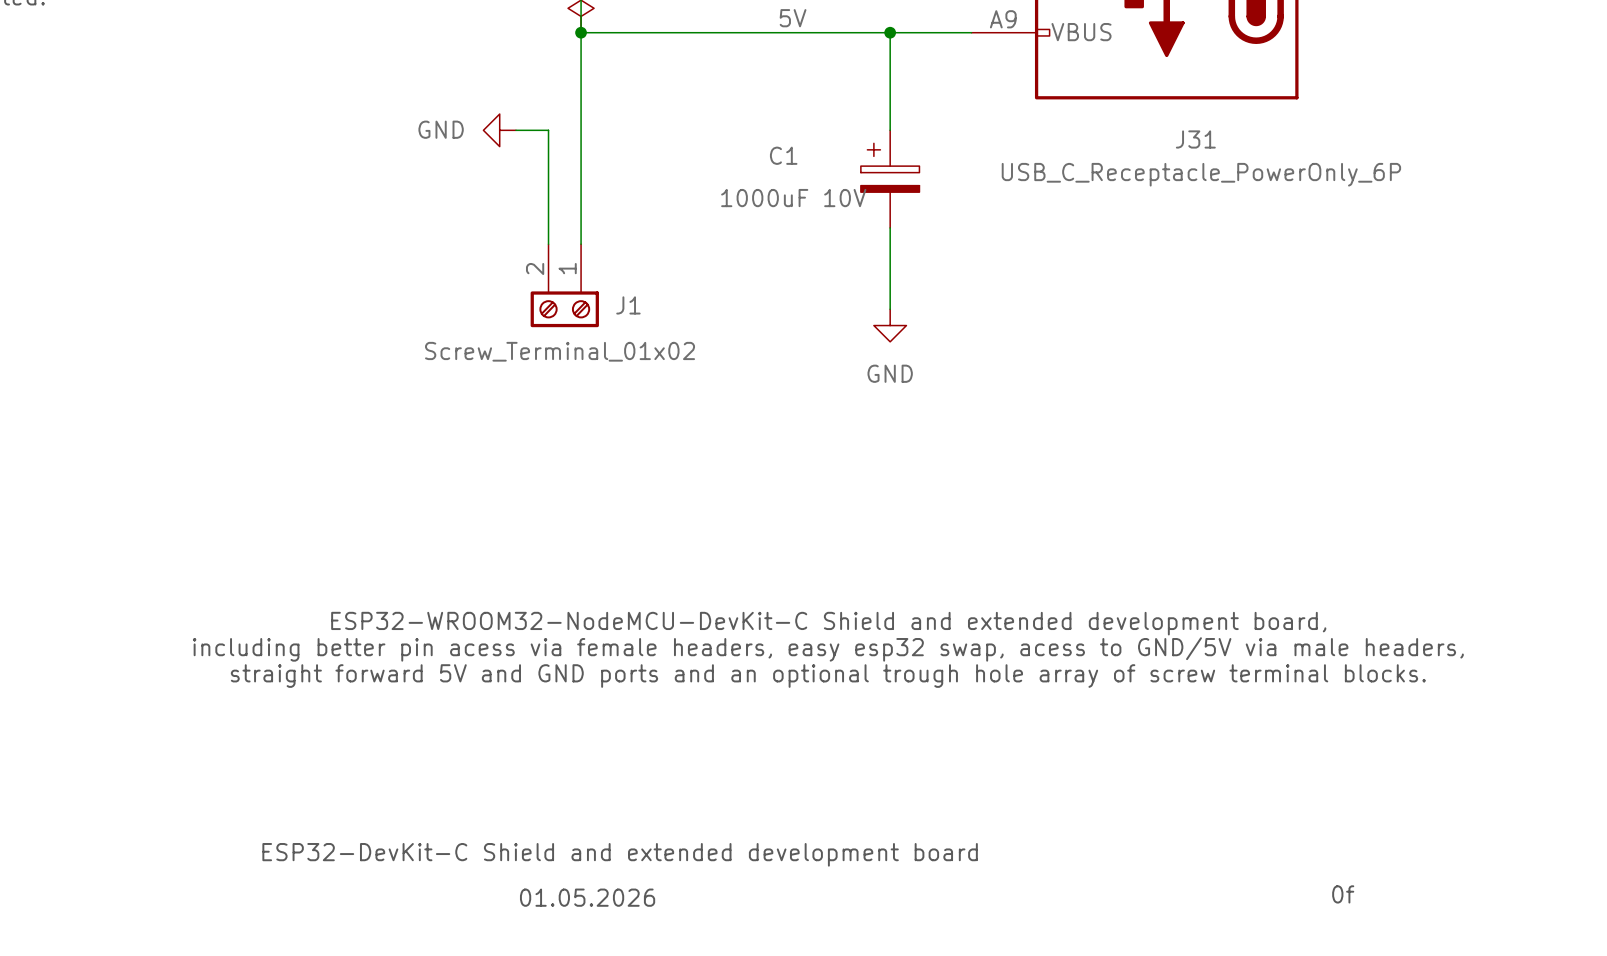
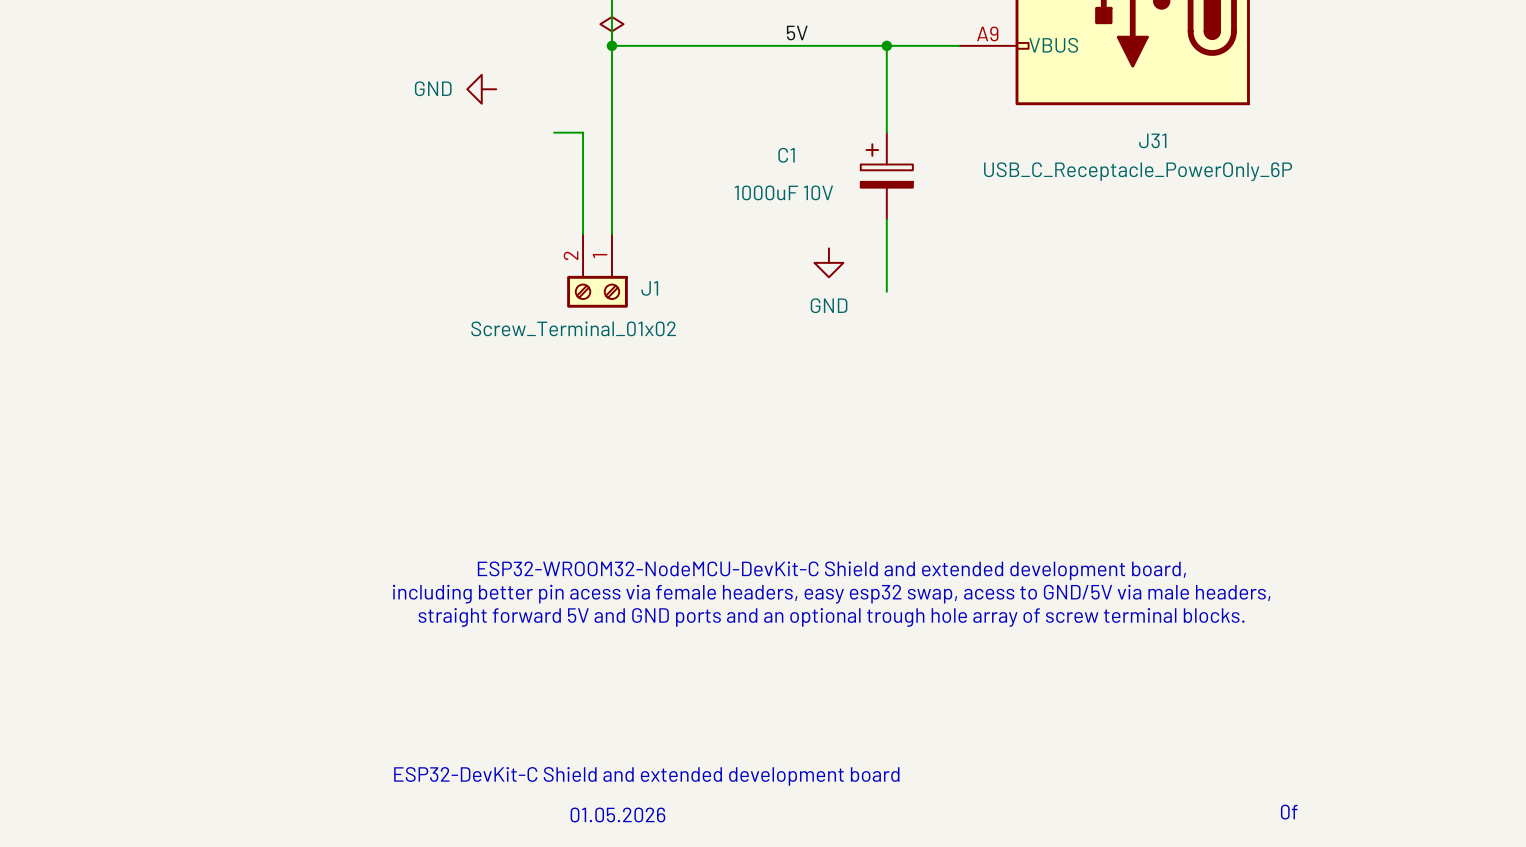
power symbol position: GND (499, 130) -> GND (481, 89)
power symbol position: GND (890, 325) -> GND (828, 262)

